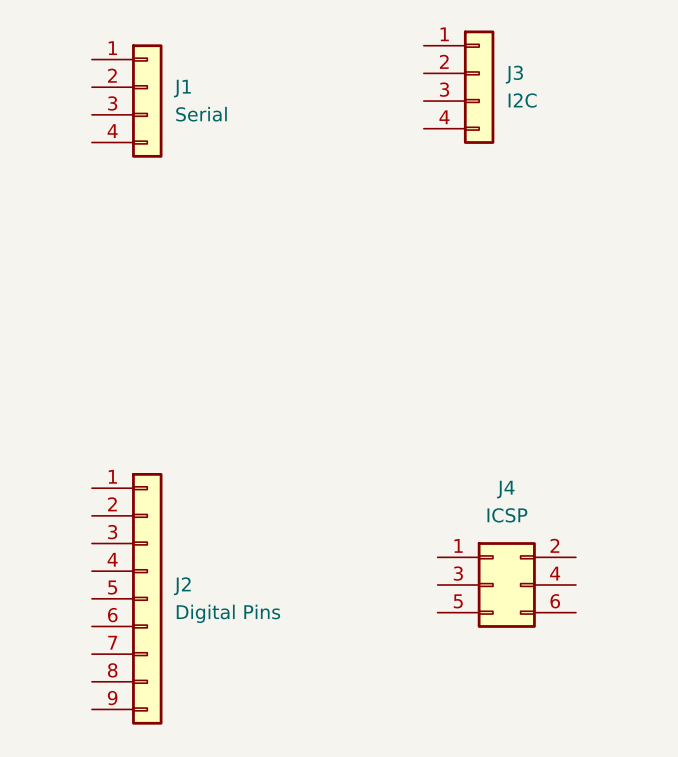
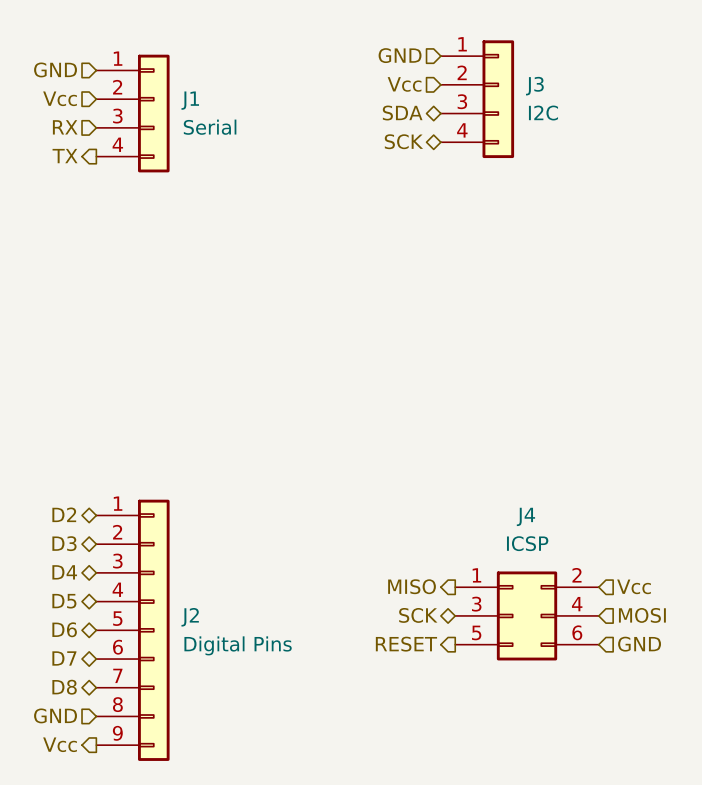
hierarchical label: none -> GND (400, 55)
hierarchical label: none -> GND (55, 69)
hierarchical label: none -> Vcc (404, 84)
hierarchical label: none -> Vcc (60, 98)
hierarchical label: none -> SDA (402, 113)
hierarchical label: none -> RX (65, 127)
hierarchical label: none -> SCK (403, 141)
hierarchical label: none -> TX (65, 156)
hierarchical label: none -> D2 (64, 514)
hierarchical label: none -> D3 (64, 543)
hierarchical label: none -> D4 (64, 572)
hierarchical label: none -> MISO (412, 586)
hierarchical label: none -> Vcc (634, 586)
hierarchical label: none -> D5 (64, 601)
hierarchical label: none -> SCK (418, 615)
hierarchical label: none -> MOSI (642, 615)
hierarchical label: none -> D6 (64, 629)
hierarchical label: none -> RESET (406, 644)
hierarchical label: none -> GND (639, 644)
hierarchical label: none -> D7 (64, 658)
hierarchical label: none -> D8 (64, 687)
hierarchical label: none -> GND (55, 715)
hierarchical label: none -> Vcc (60, 744)

